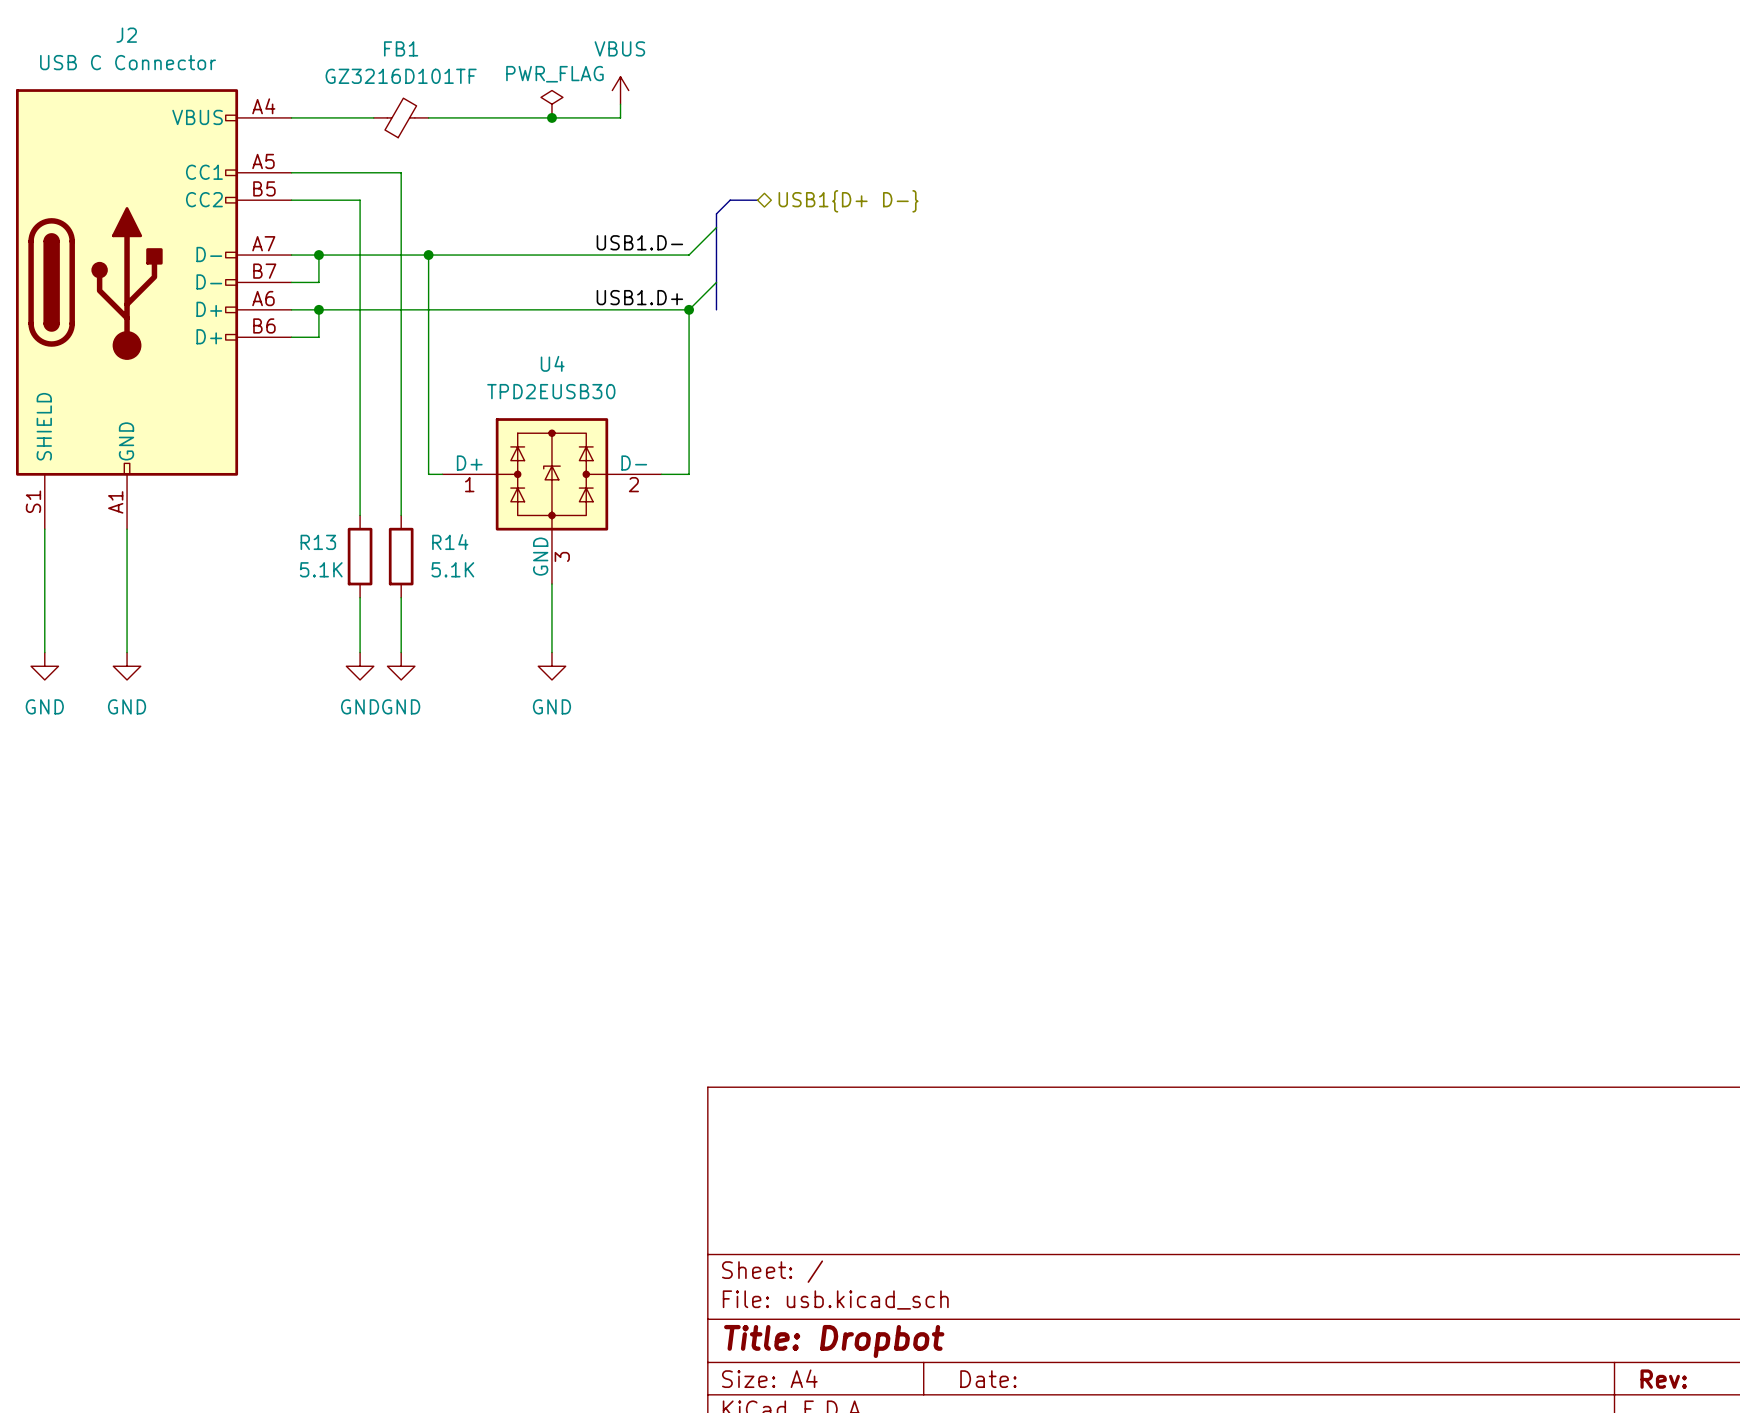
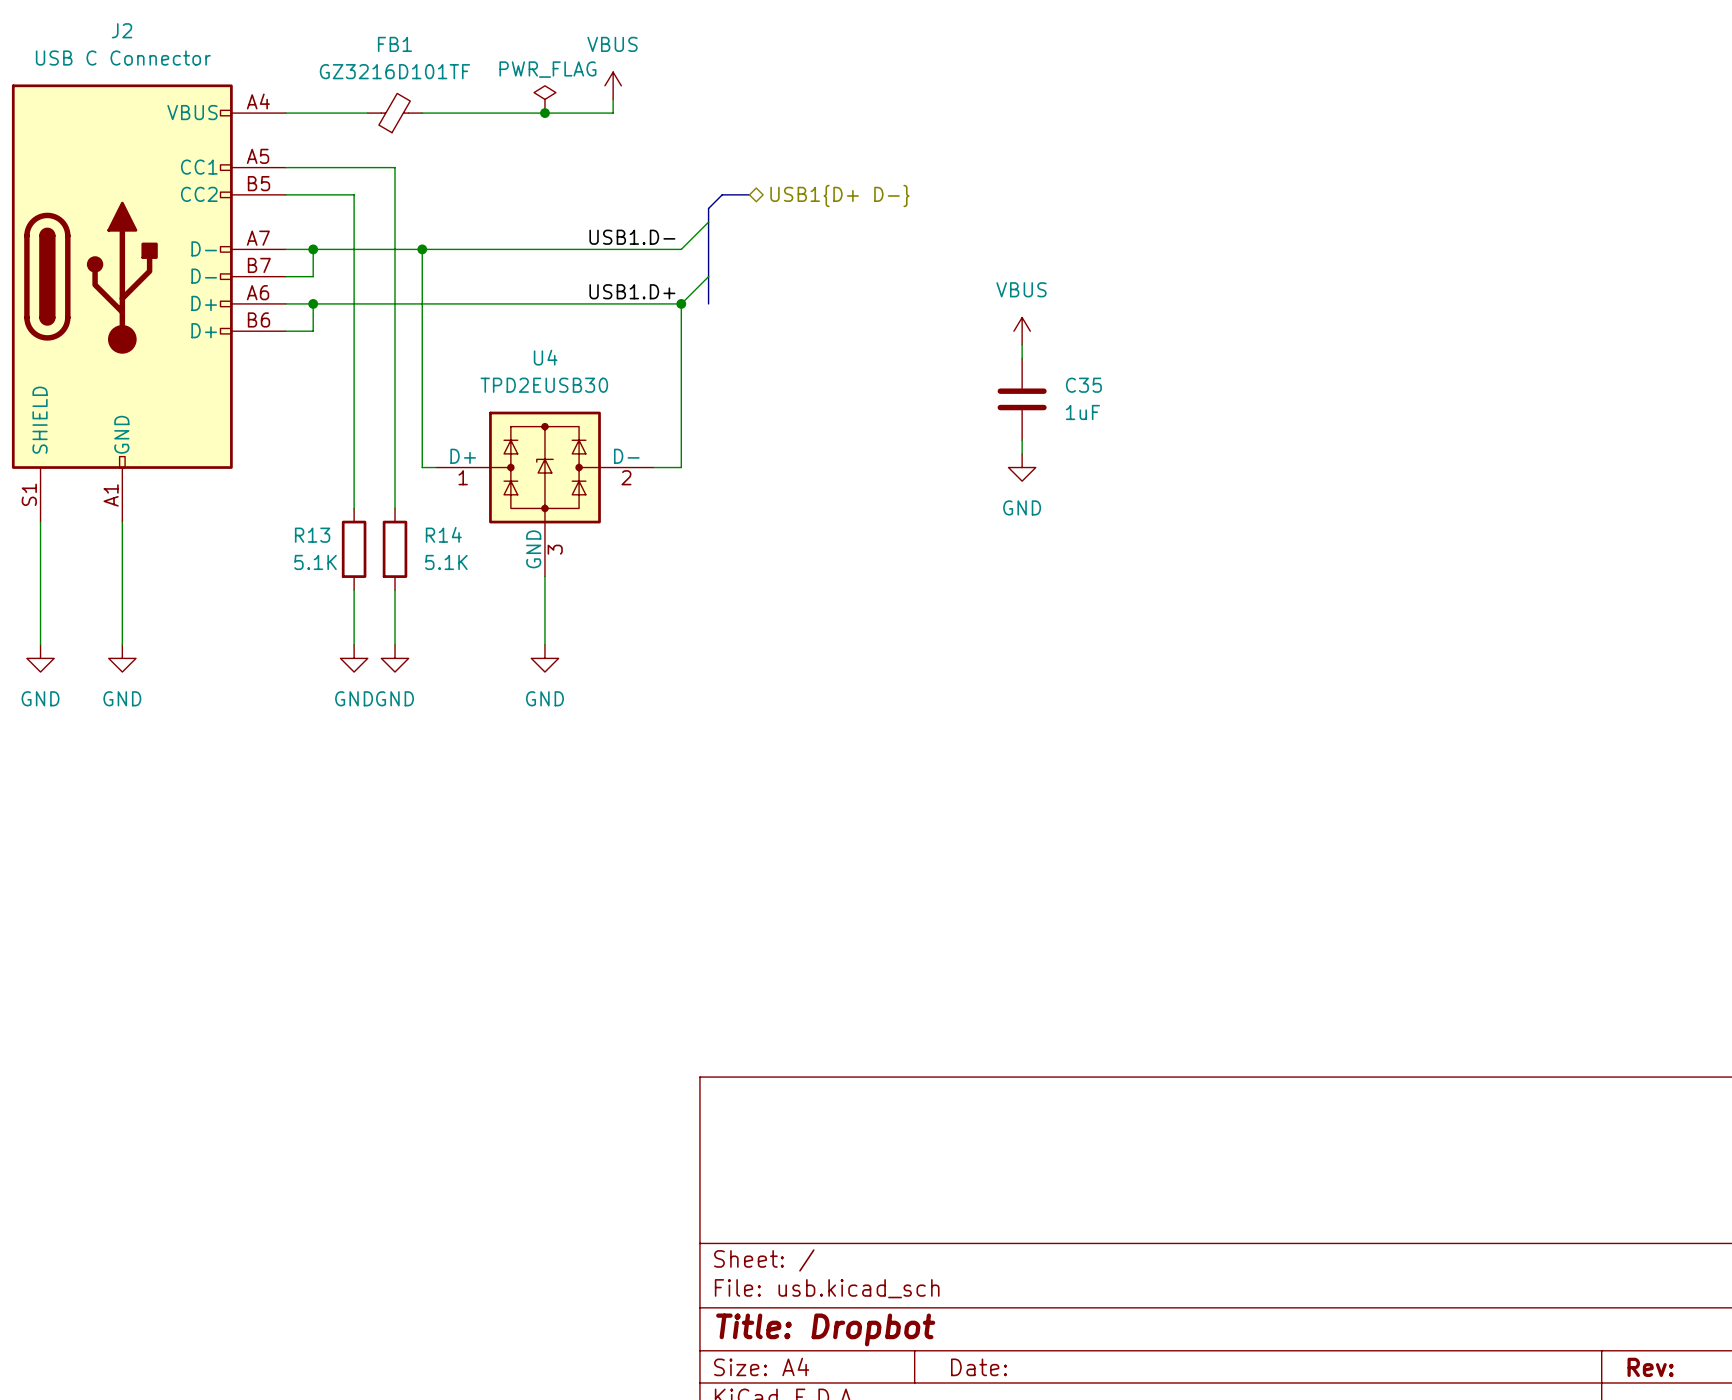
power symbol: none -> VBUS (1022, 331)
wire: none -> (1022, 344) (1022, 358)
C35: none -> 1uF (1022, 399)
wire: none -> (1022, 440) (1022, 453)
power symbol: none -> GND (1022, 467)

